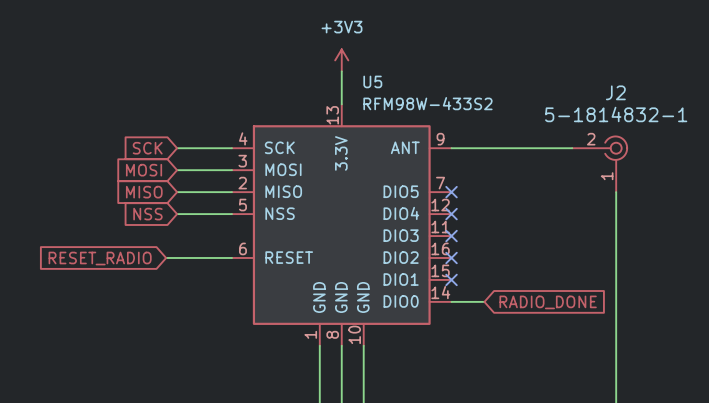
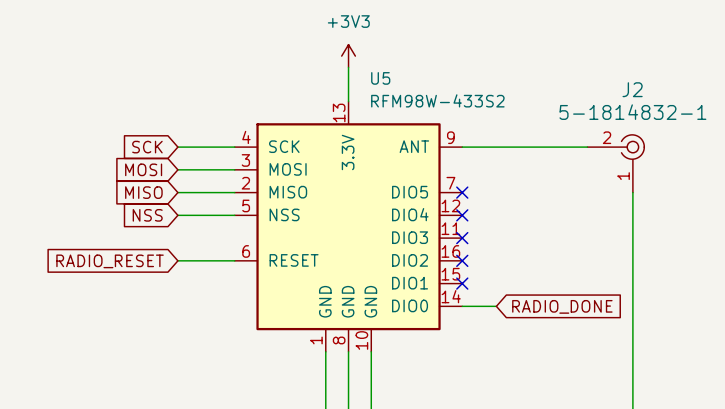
wire: (166, 257) (177, 257) -> none
global label: RESET_RADIO (100, 258) -> none
global label: none -> RADIO_RESET (110, 261)

